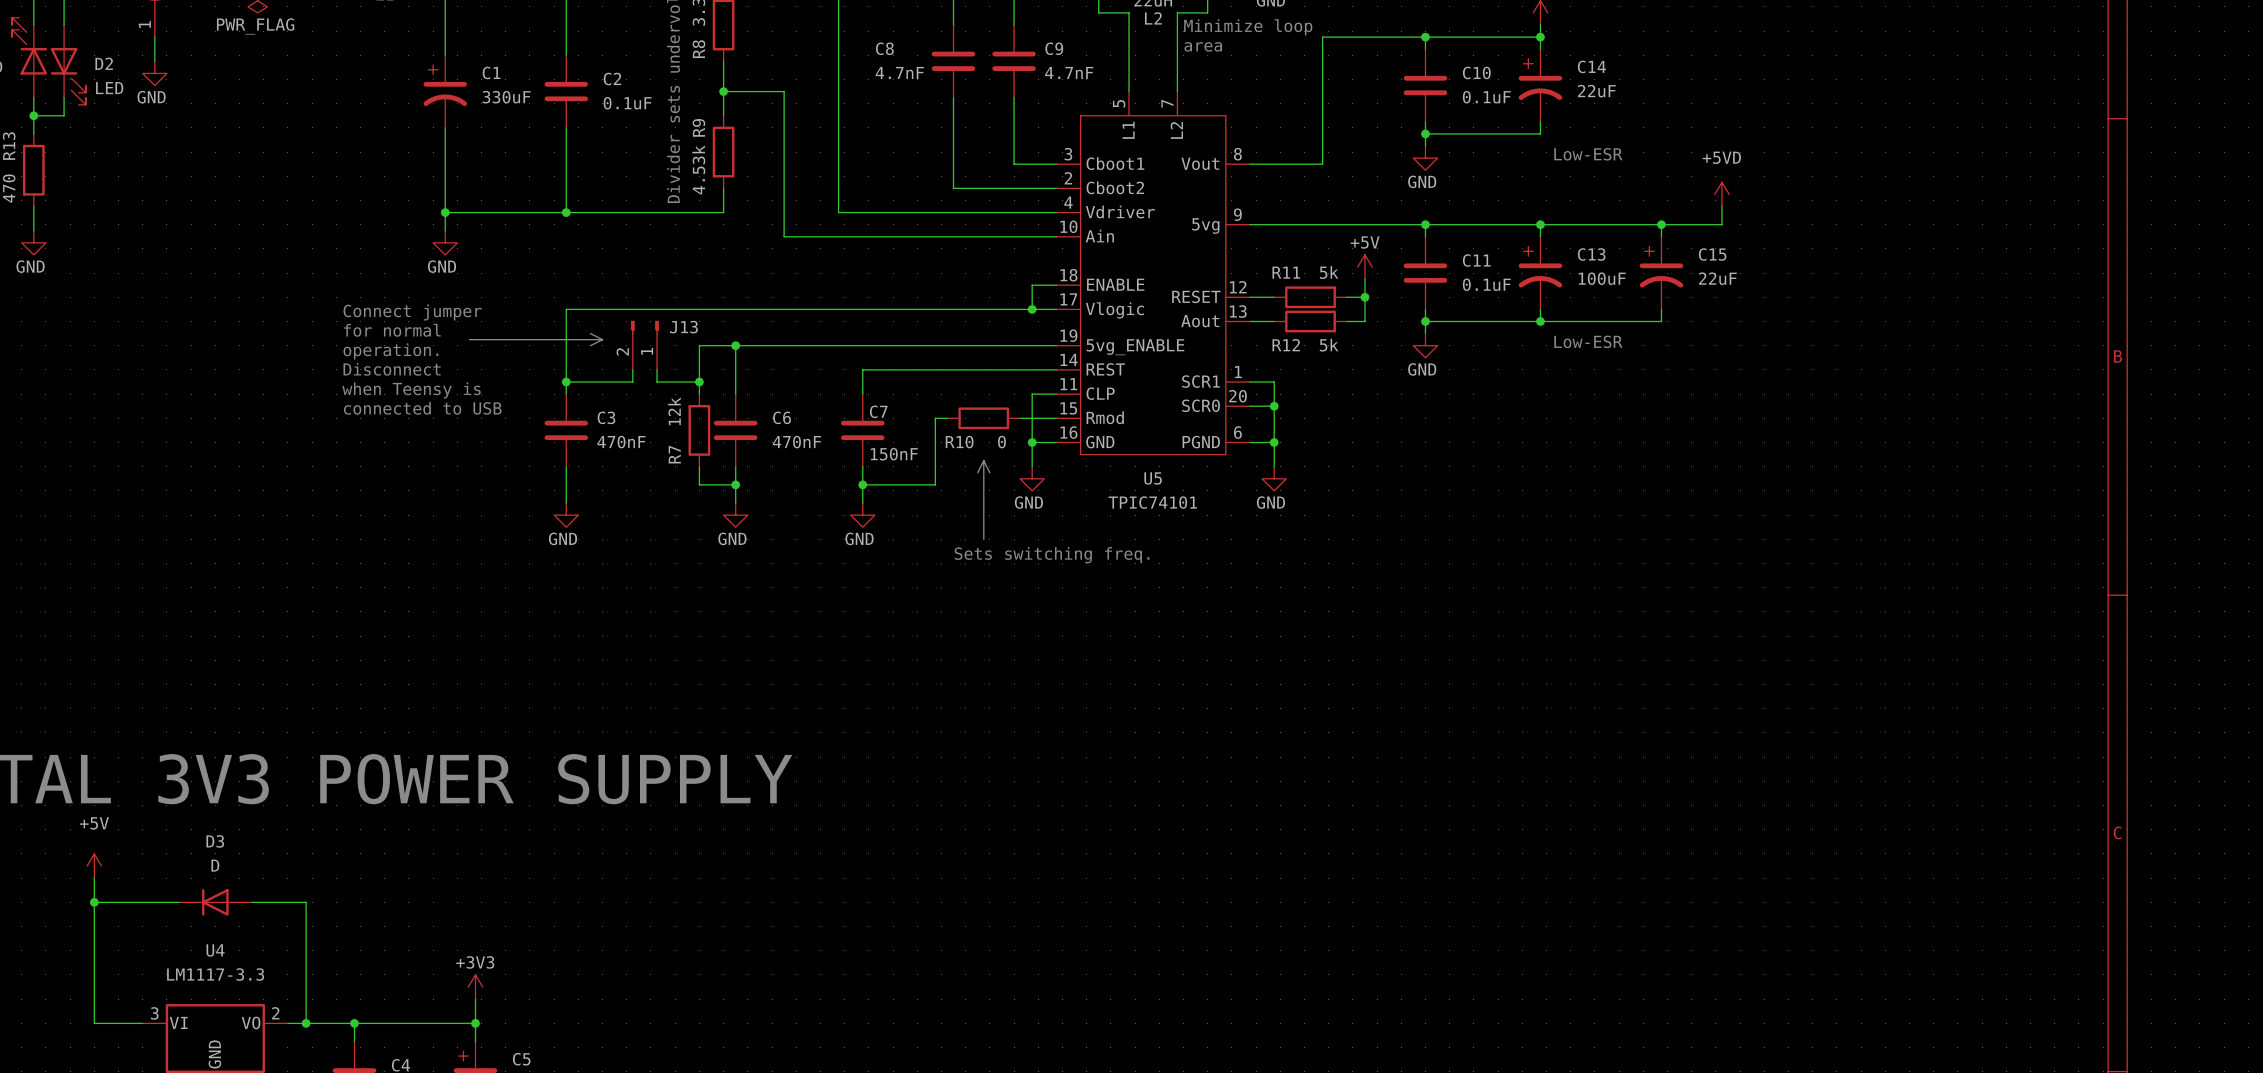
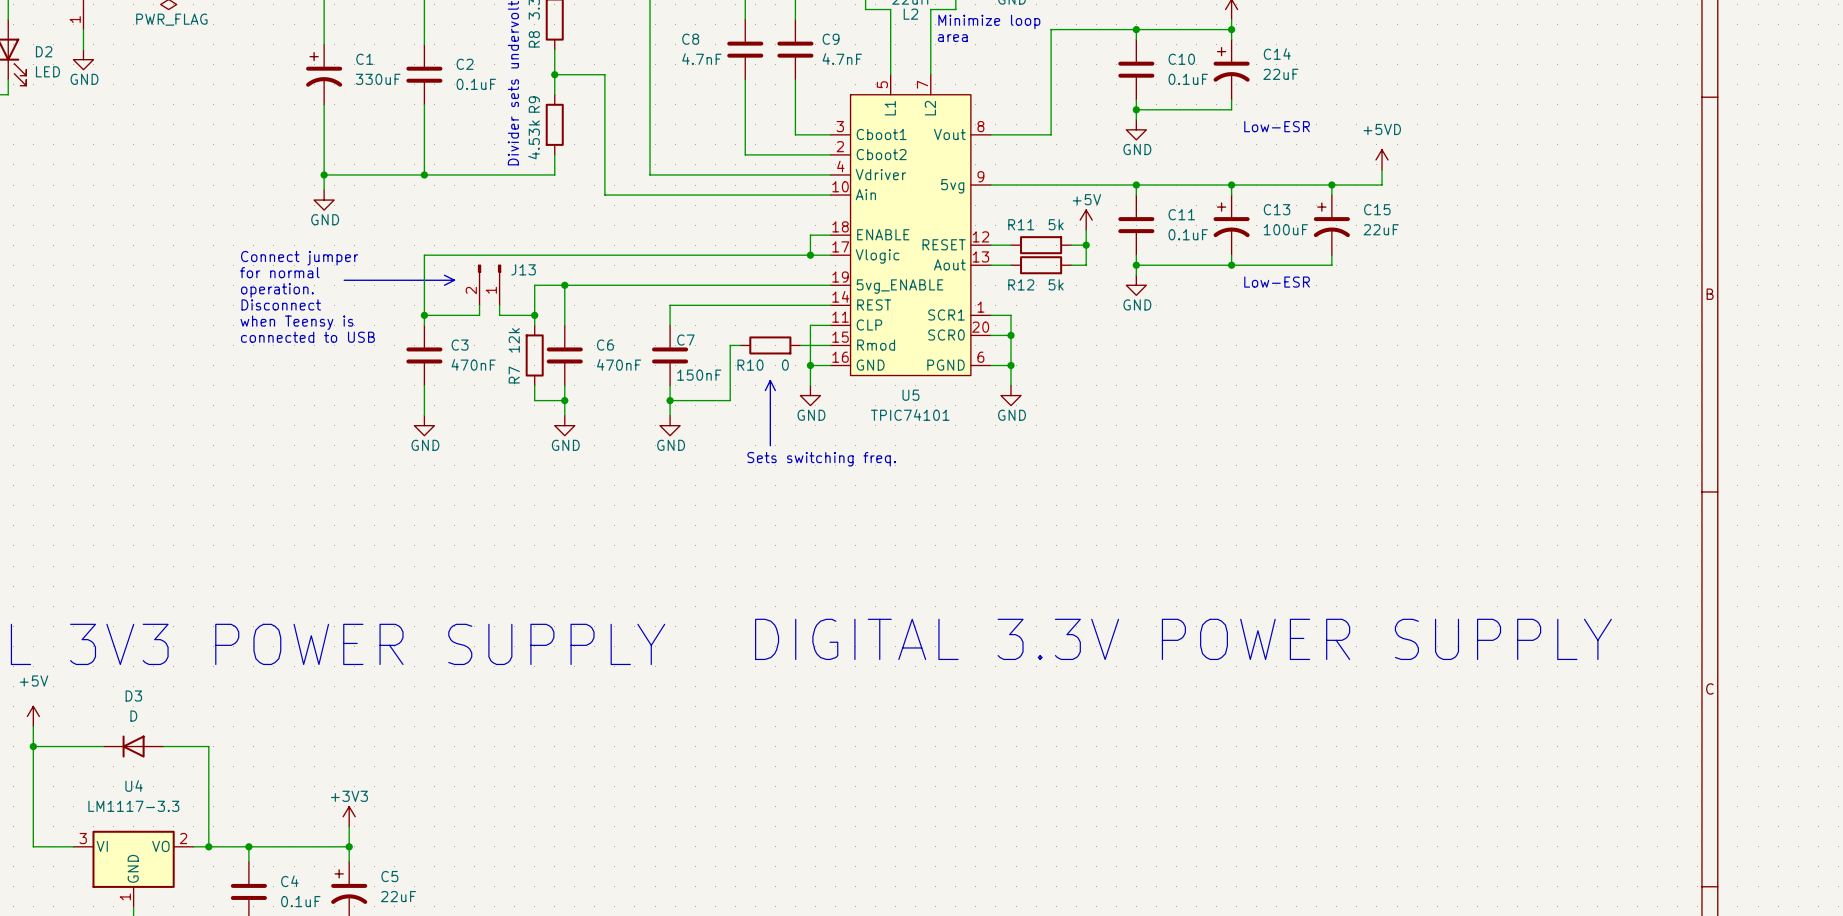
text: none -> DIGITAL 3.3V POWER SUPPLY (1183, 639)

